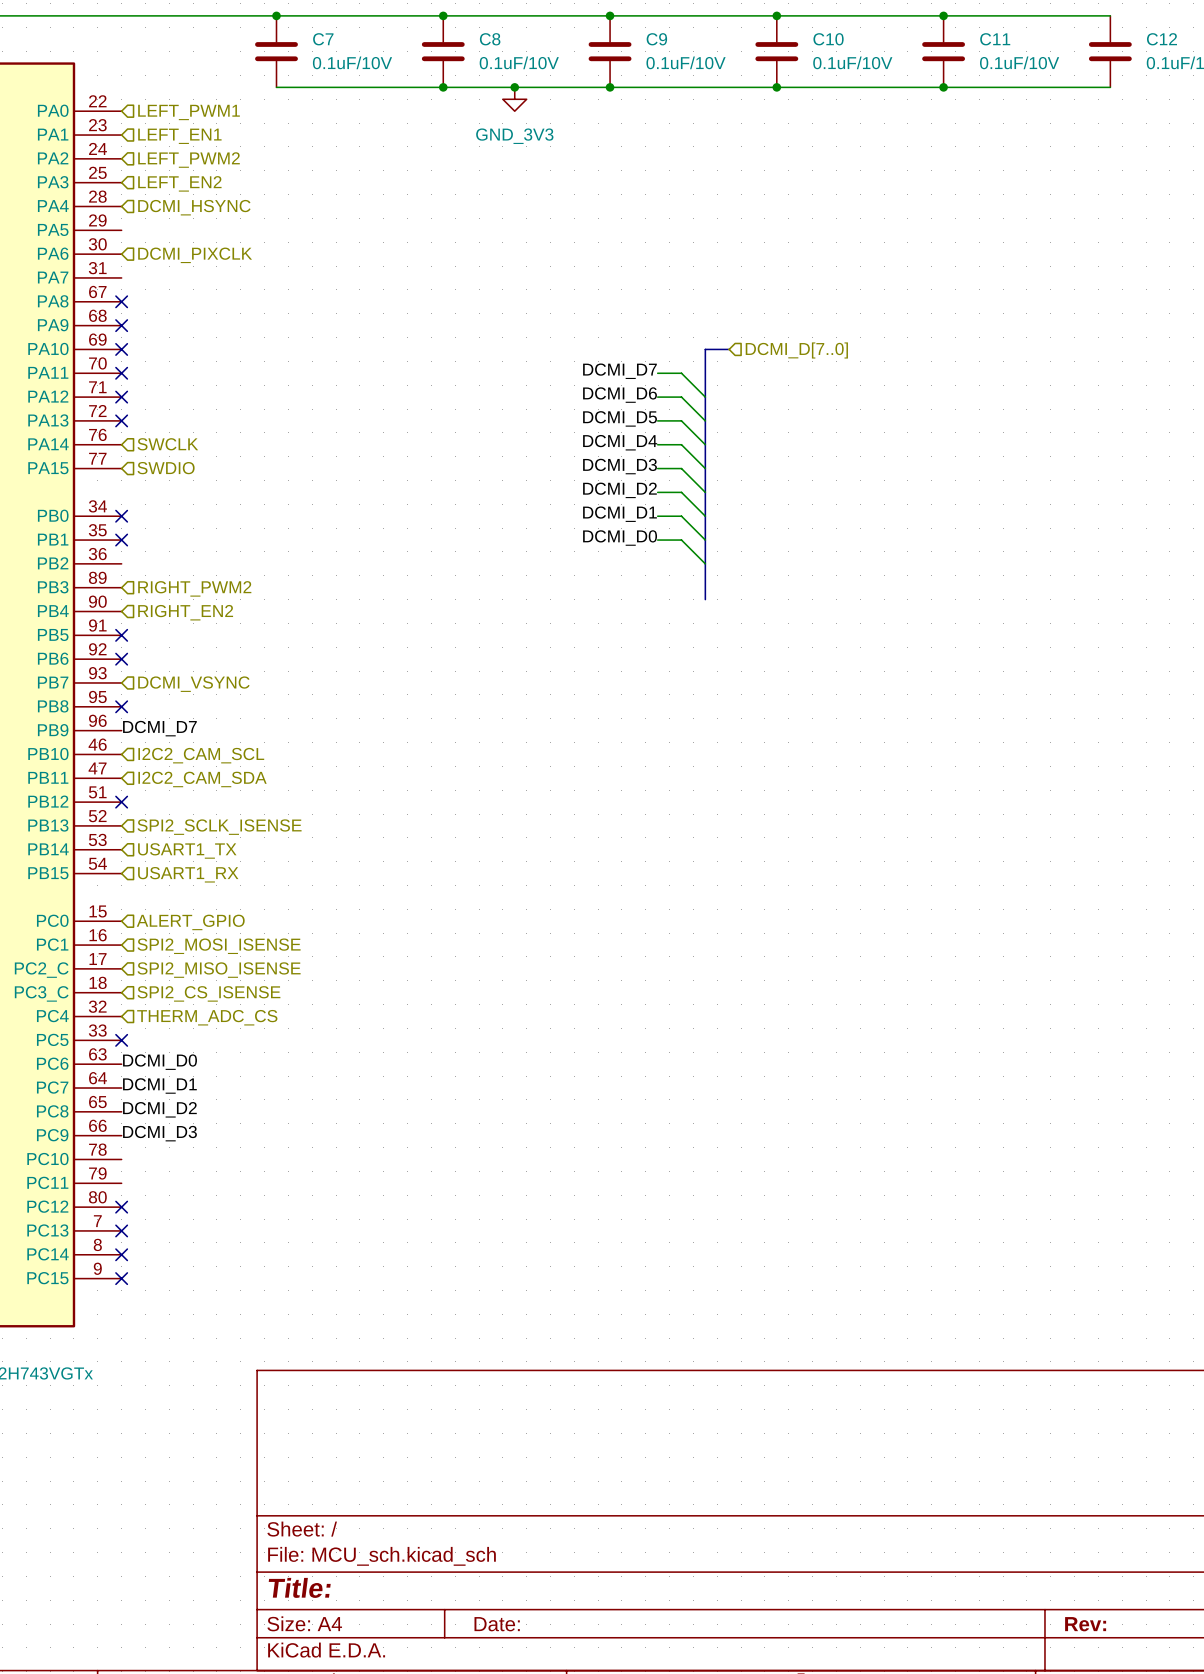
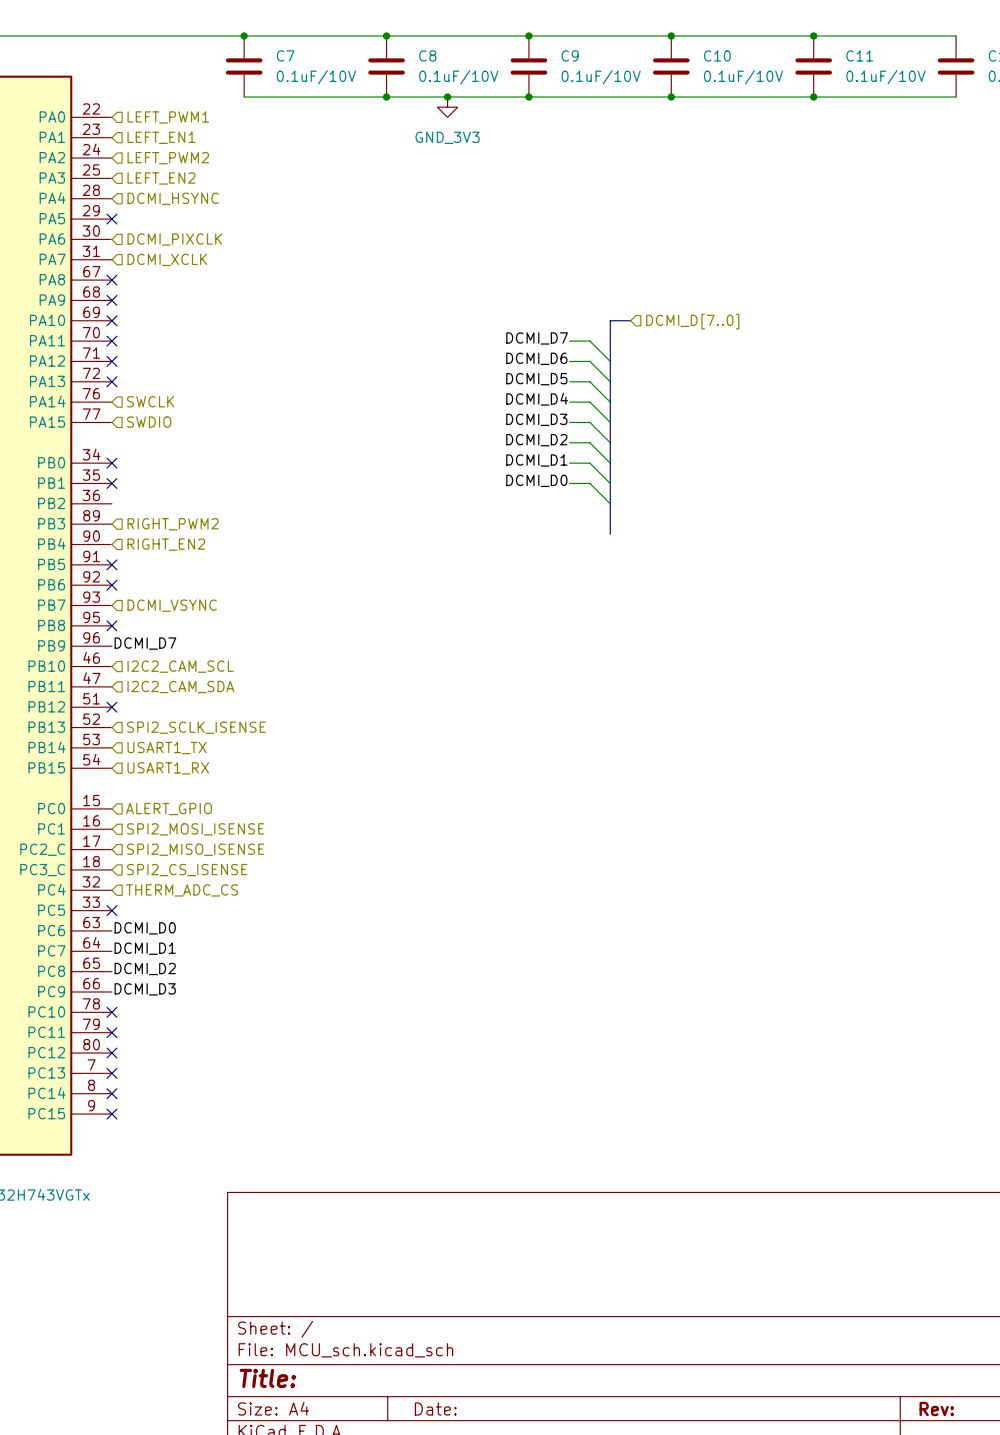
no-connect mark: none -> (111, 219)
hierarchical label: none -> DCMI_XCLK (167, 259)
no-connect mark: none -> (111, 1012)
no-connect mark: none -> (111, 1032)

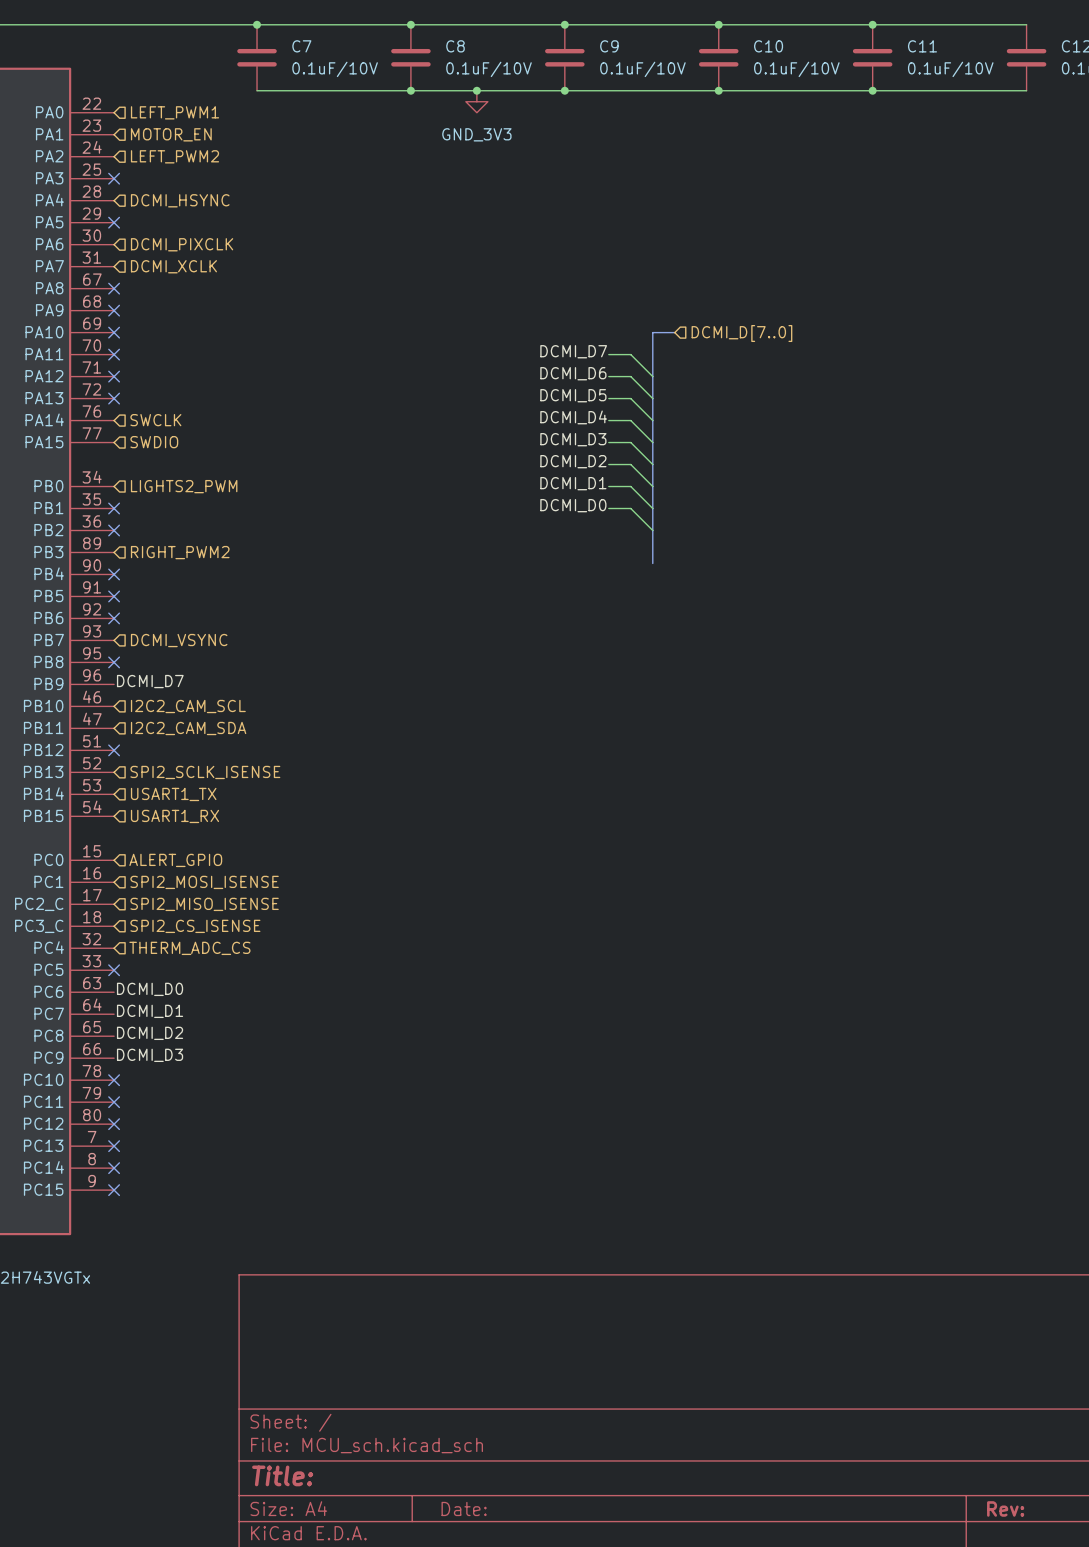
hierarchical label: LEFT_EN1 (161, 137) -> MOTOR_EN (171, 134)
no-connect mark: none -> (114, 178)
hierarchical label: LEFT_EN2 (161, 178) -> none
no-connect mark: (111, 463) -> none
hierarchical label: none -> LIGHTS2_PWM (184, 486)
no-connect mark: none -> (114, 530)
no-connect mark: none -> (114, 574)
hierarchical label: RIGHT_EN2 (166, 544) -> none

